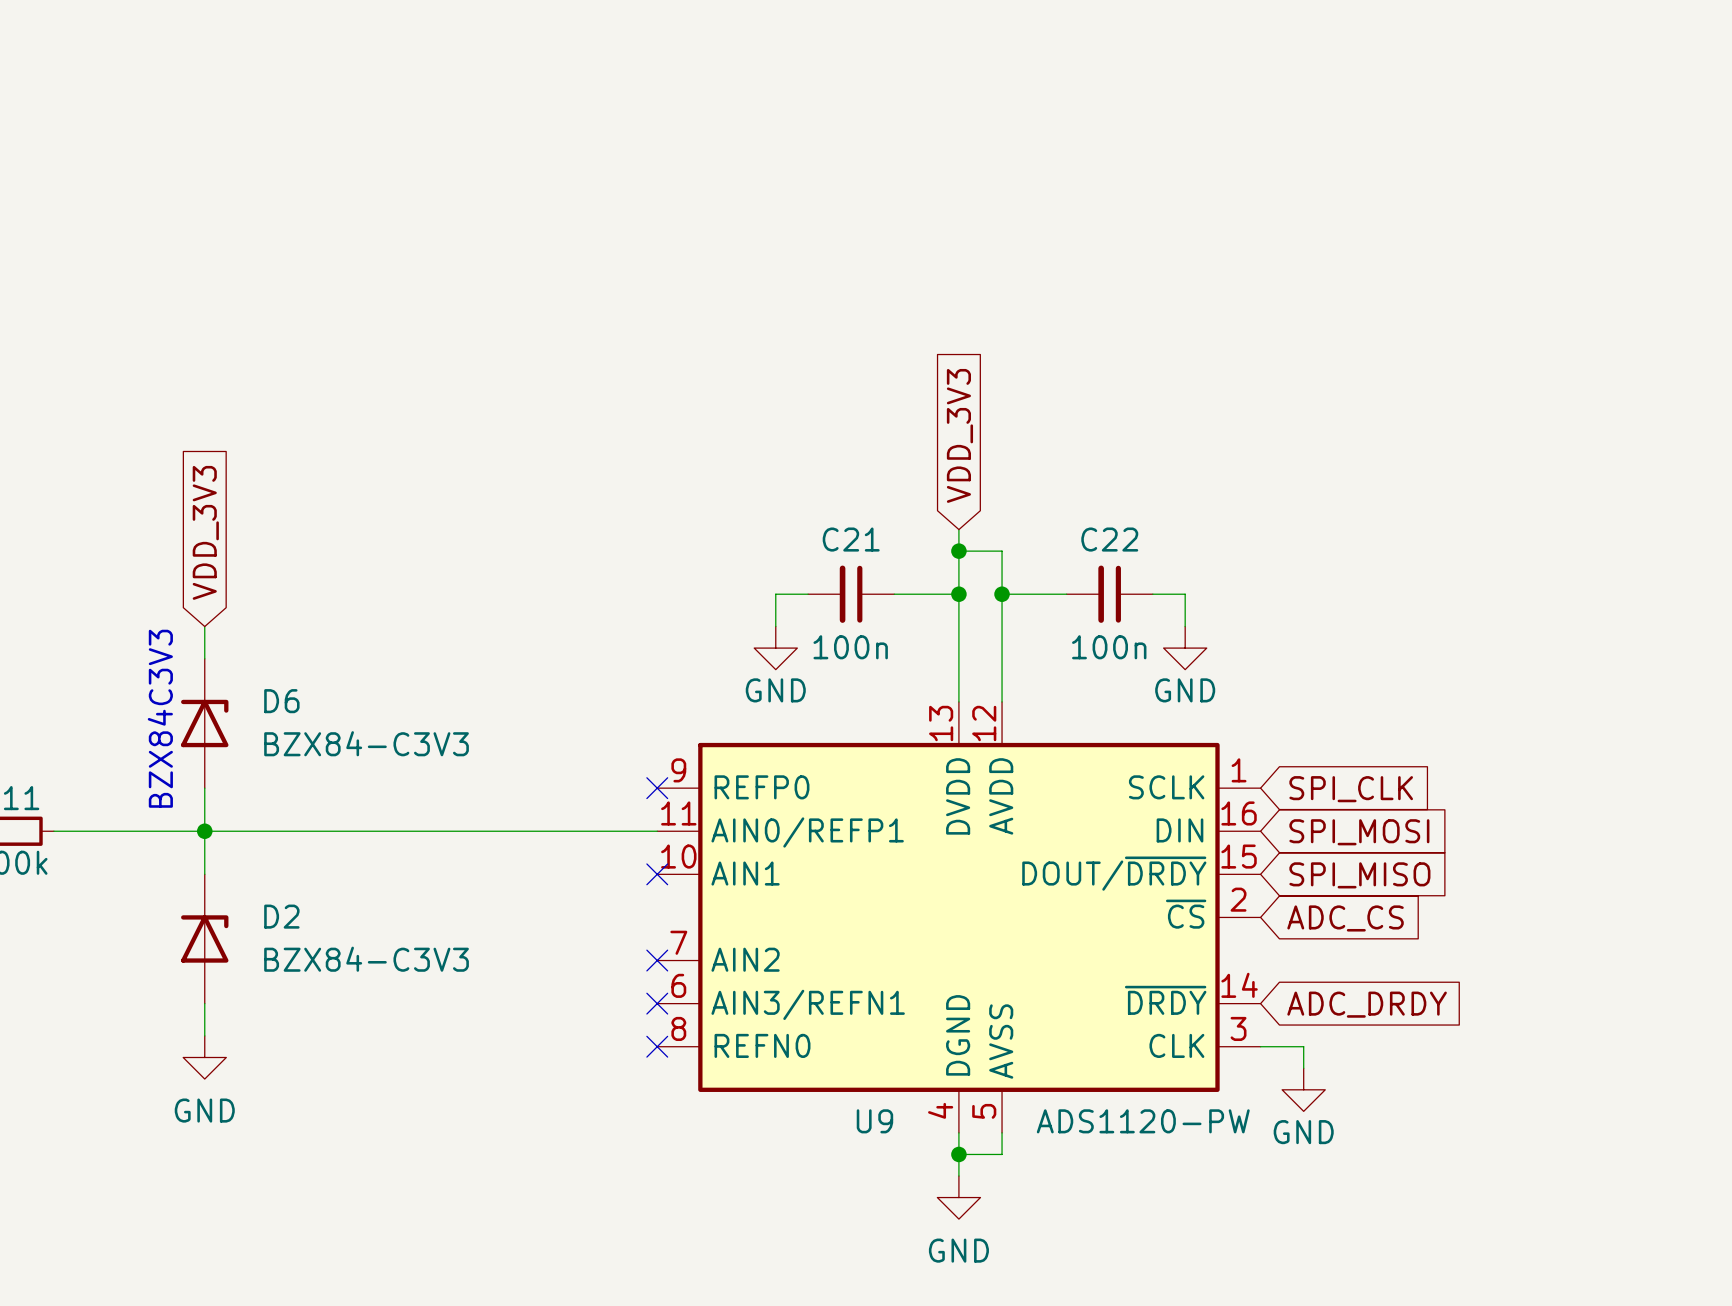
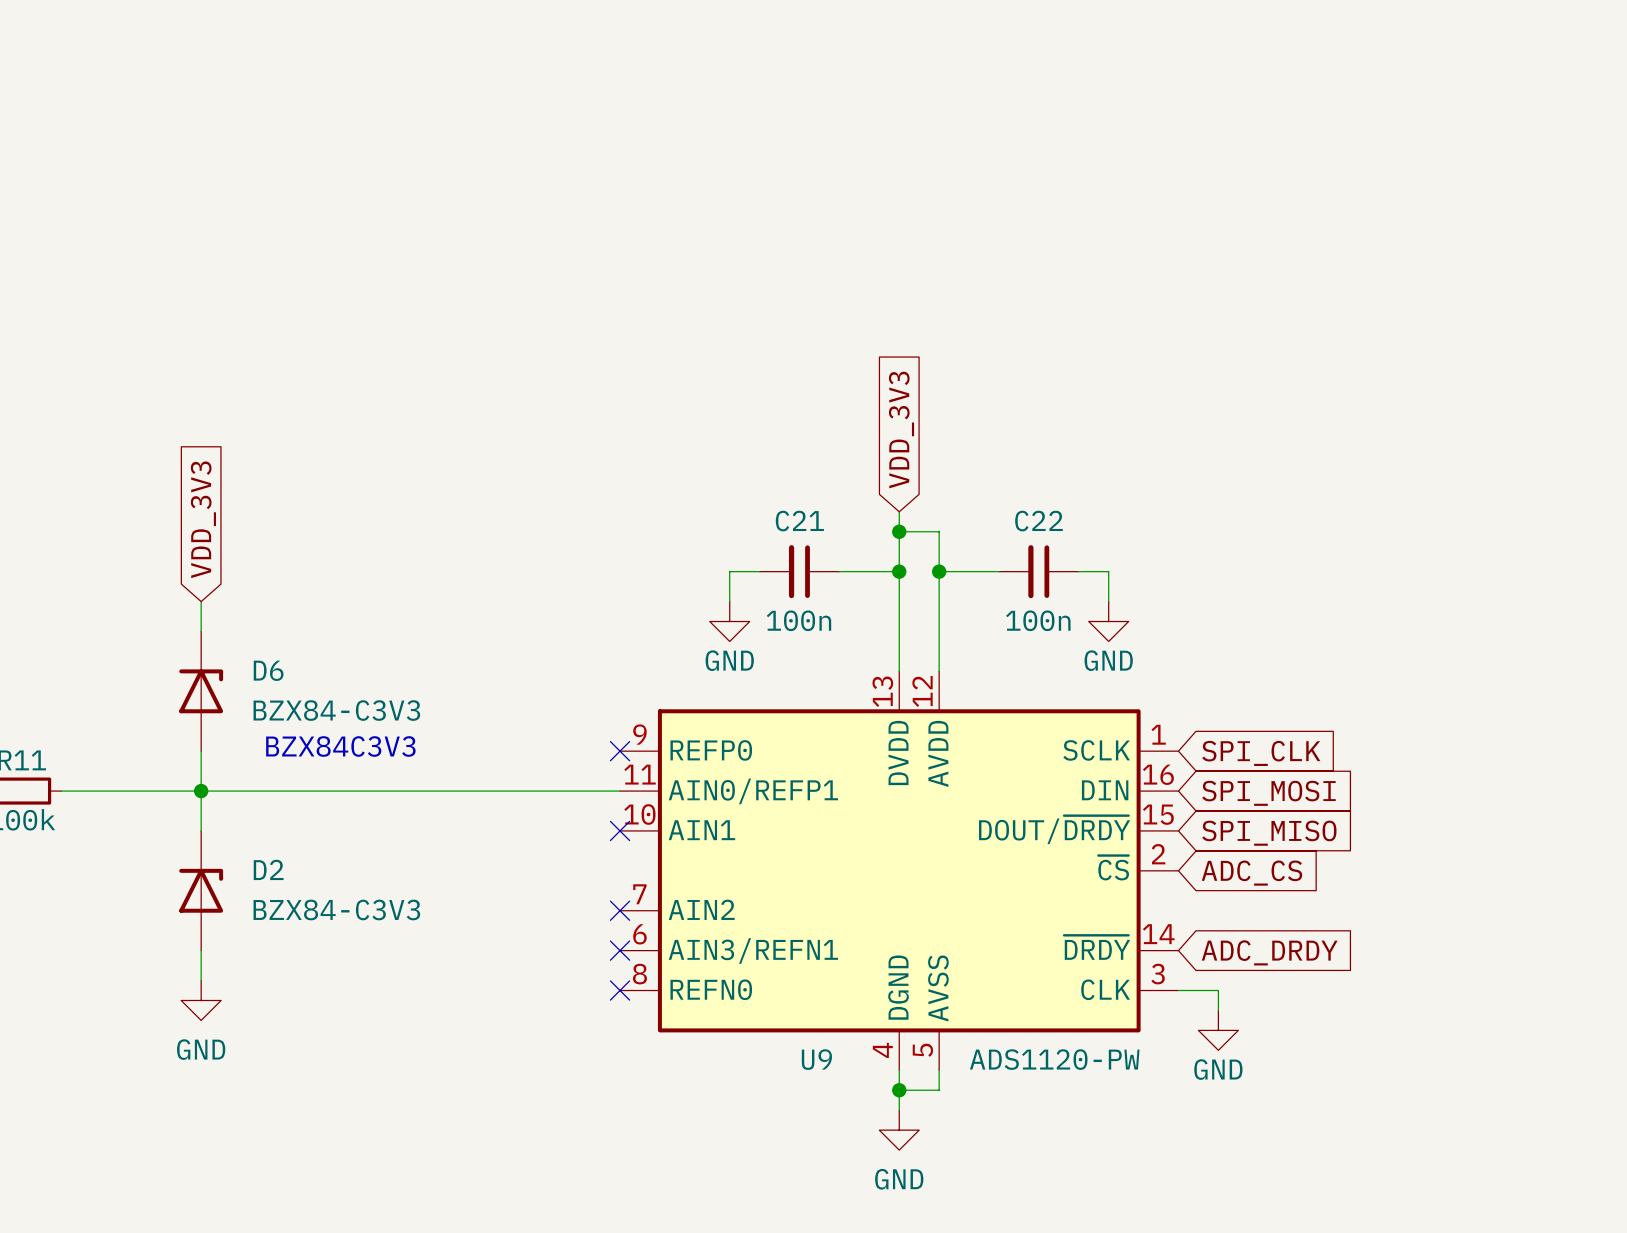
text rotation: 0° (160, 718) -> 90° clockwise (340, 746)

